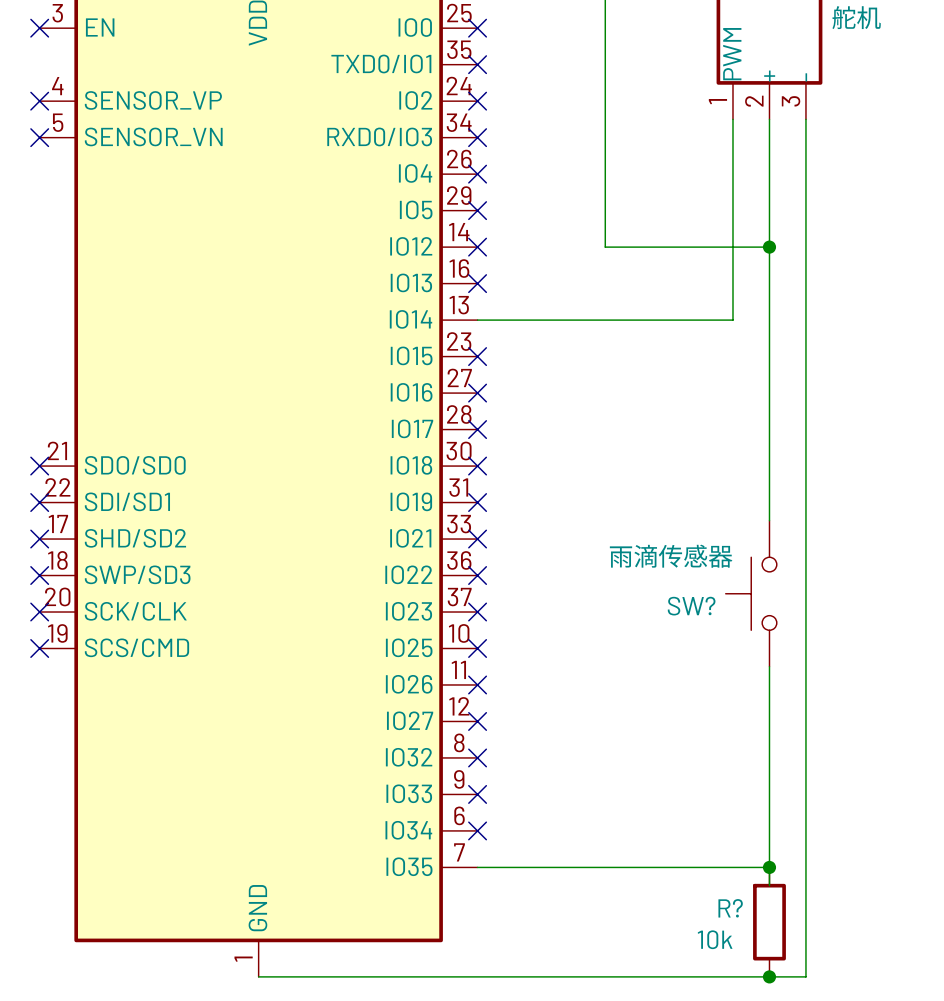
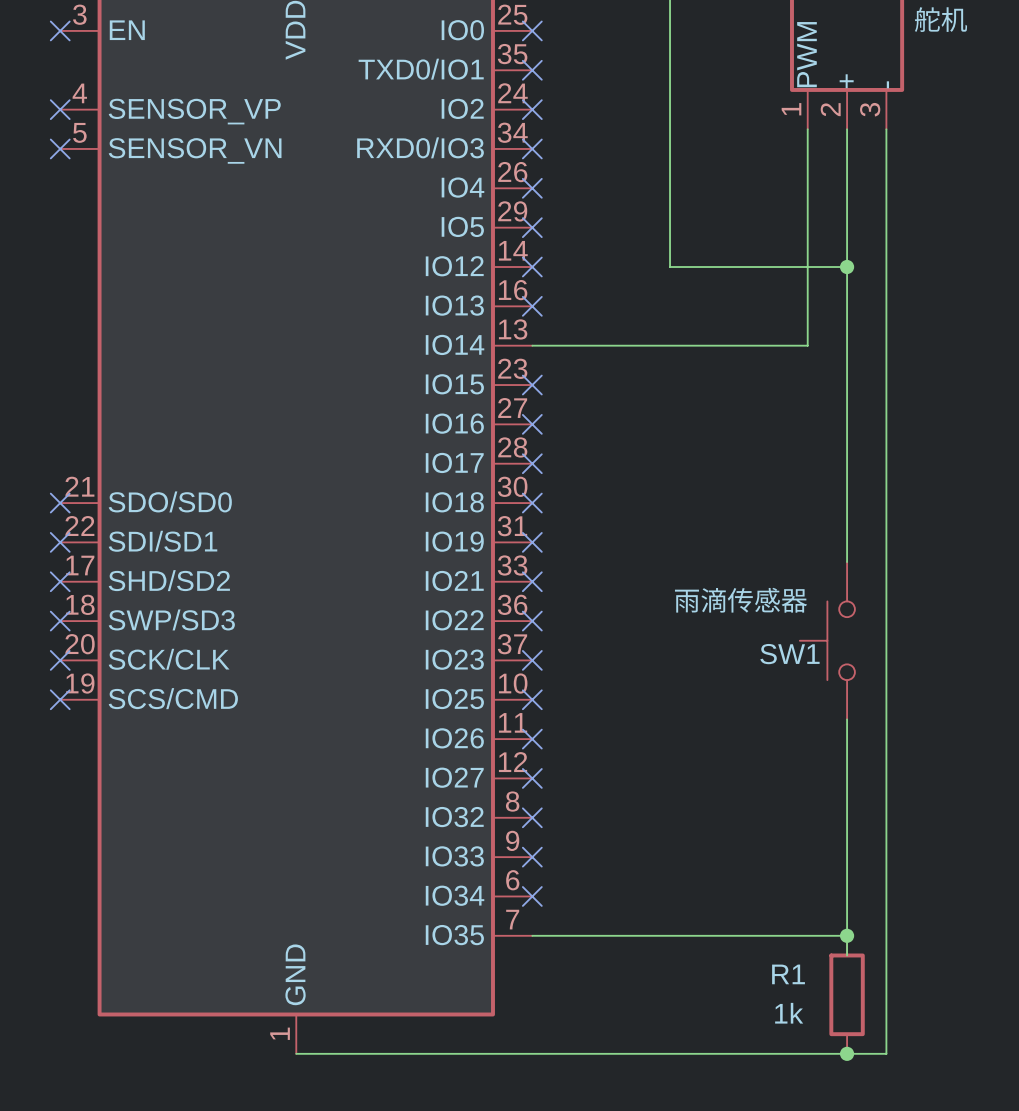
SW? name: SW? (691, 606) -> SW1 (789, 654)
R? name: R? (730, 908) -> R1 (788, 974)
R? value: 10k (715, 939) -> 1k (789, 1013)

